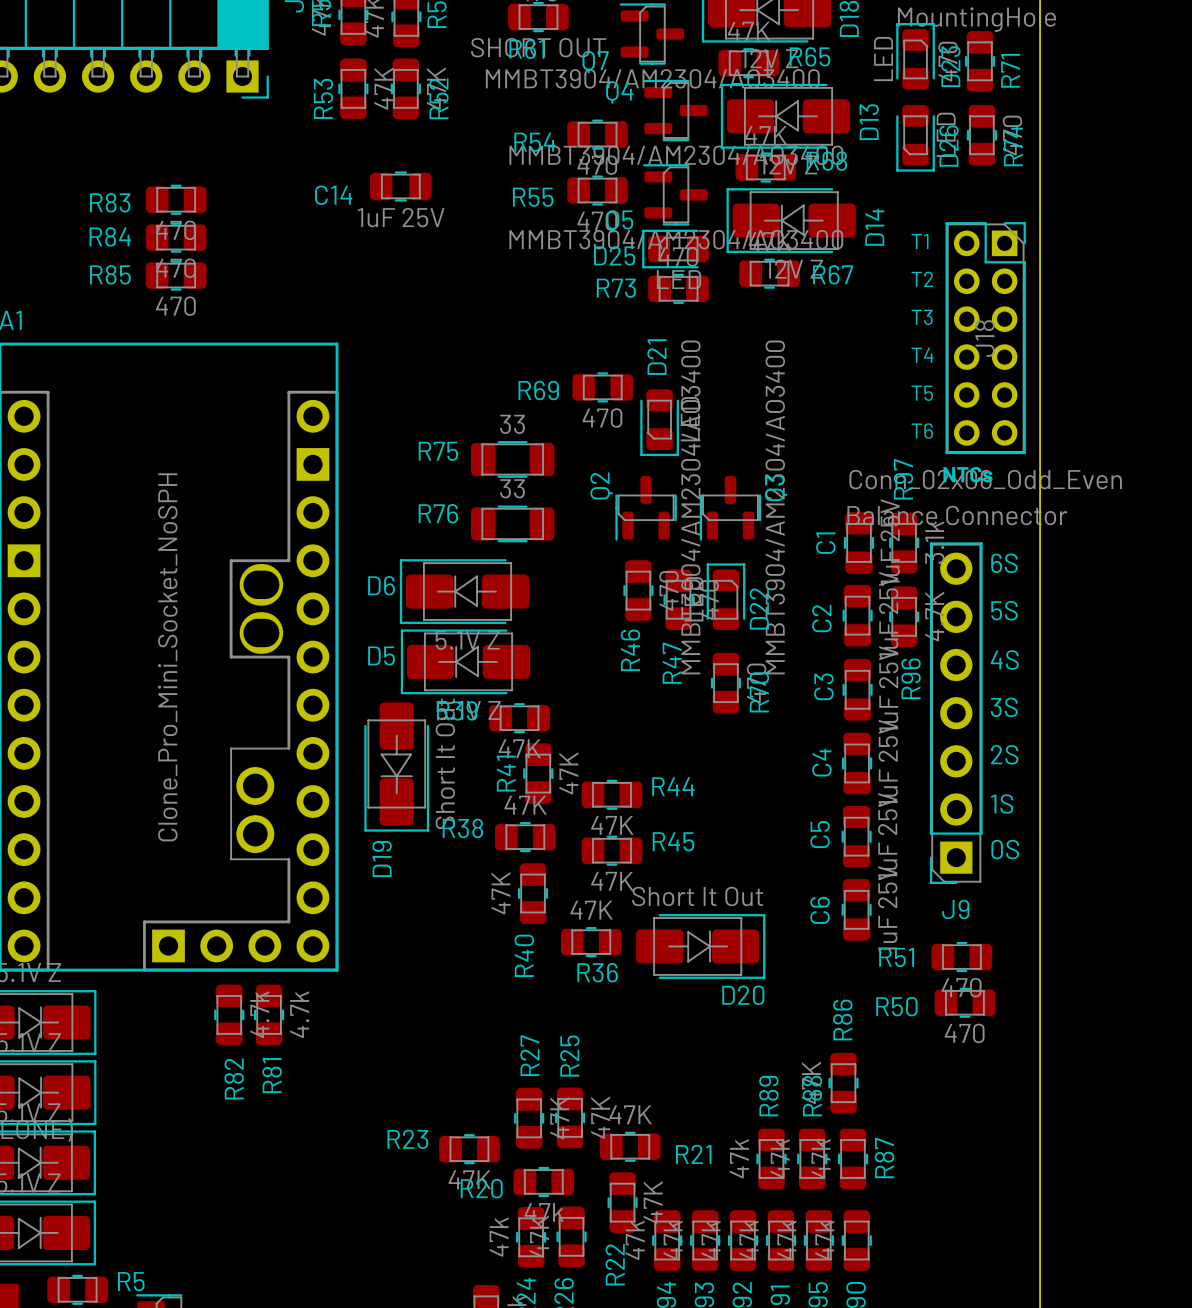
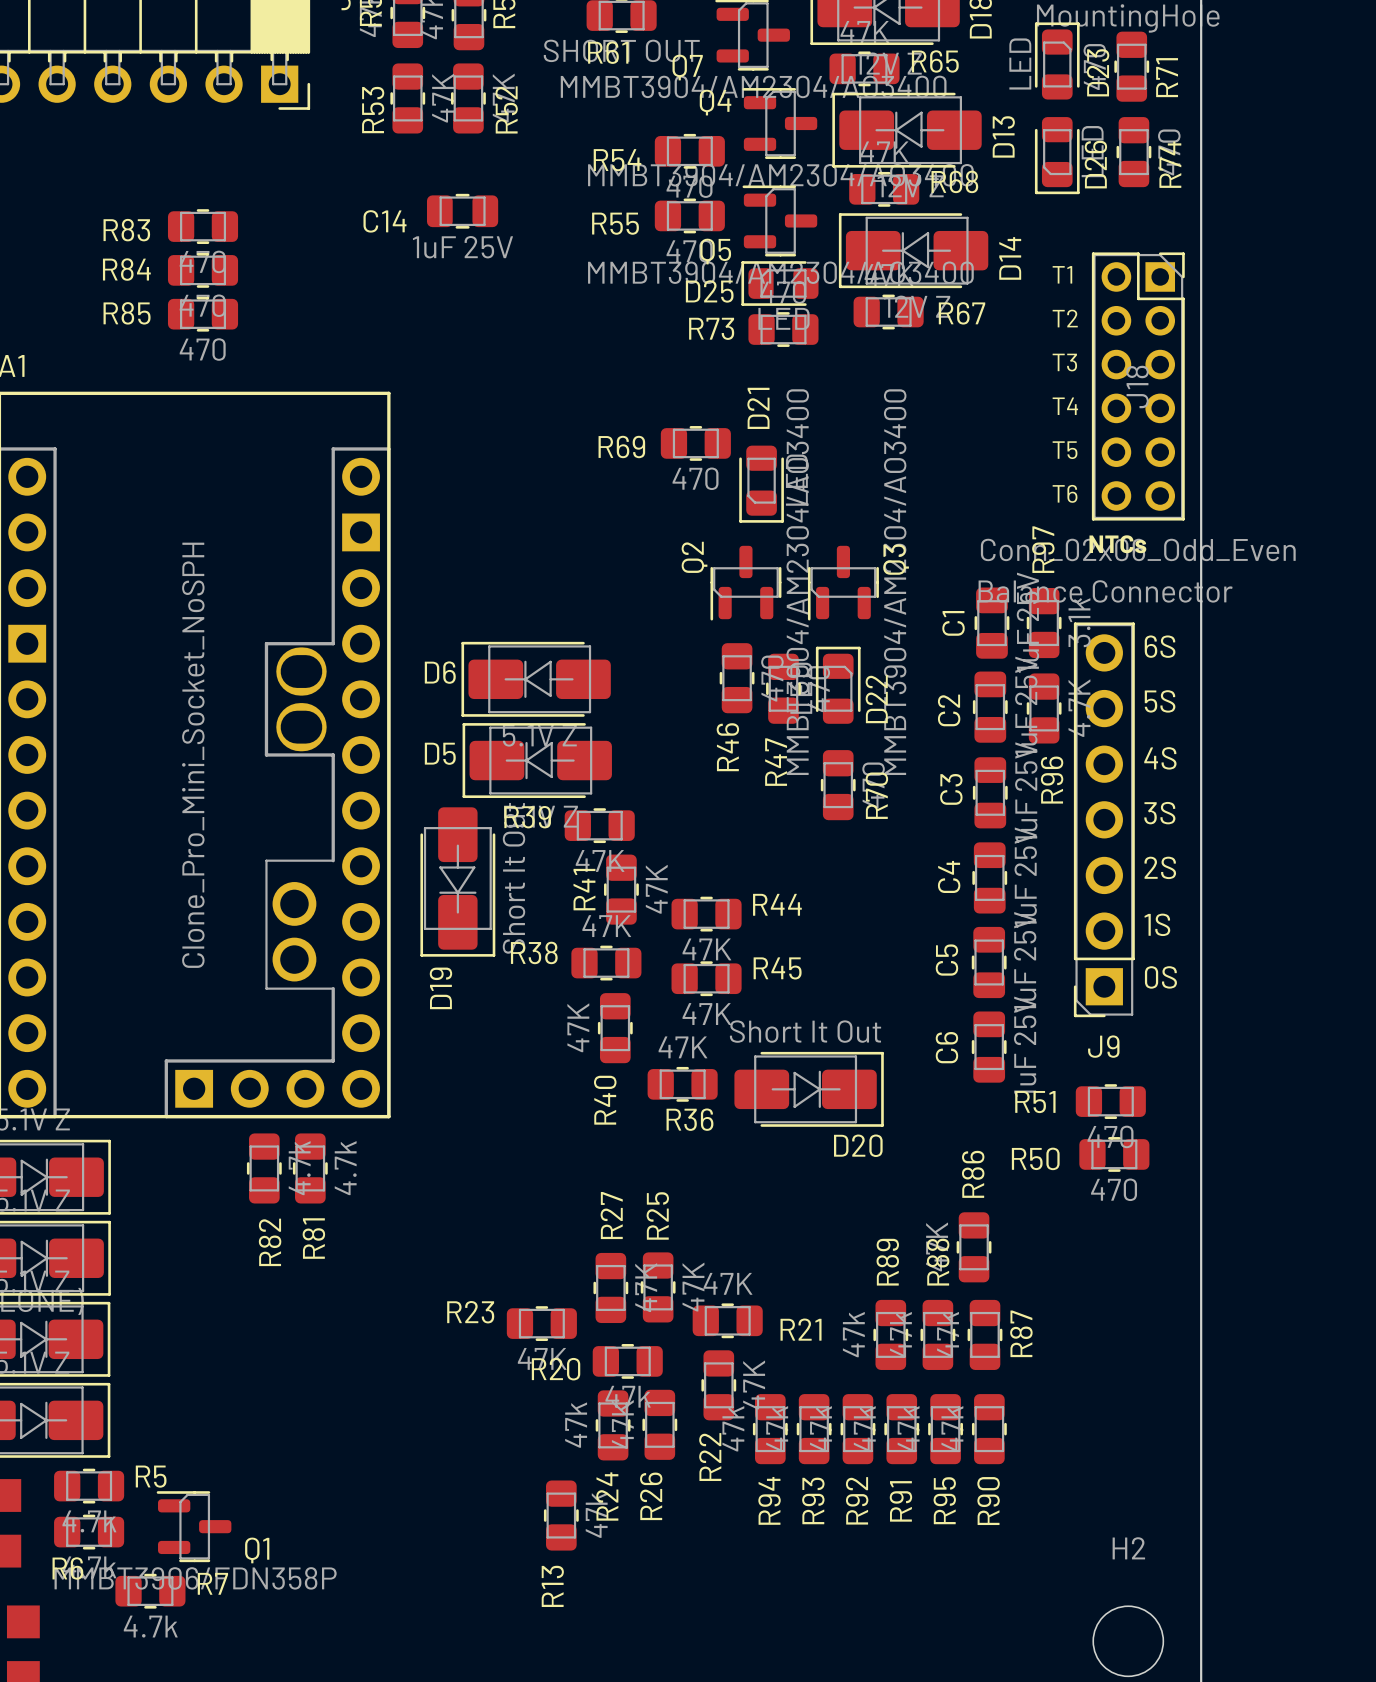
R75: 33 (512, 459) -> none
R76: 33 (512, 523) -> none

